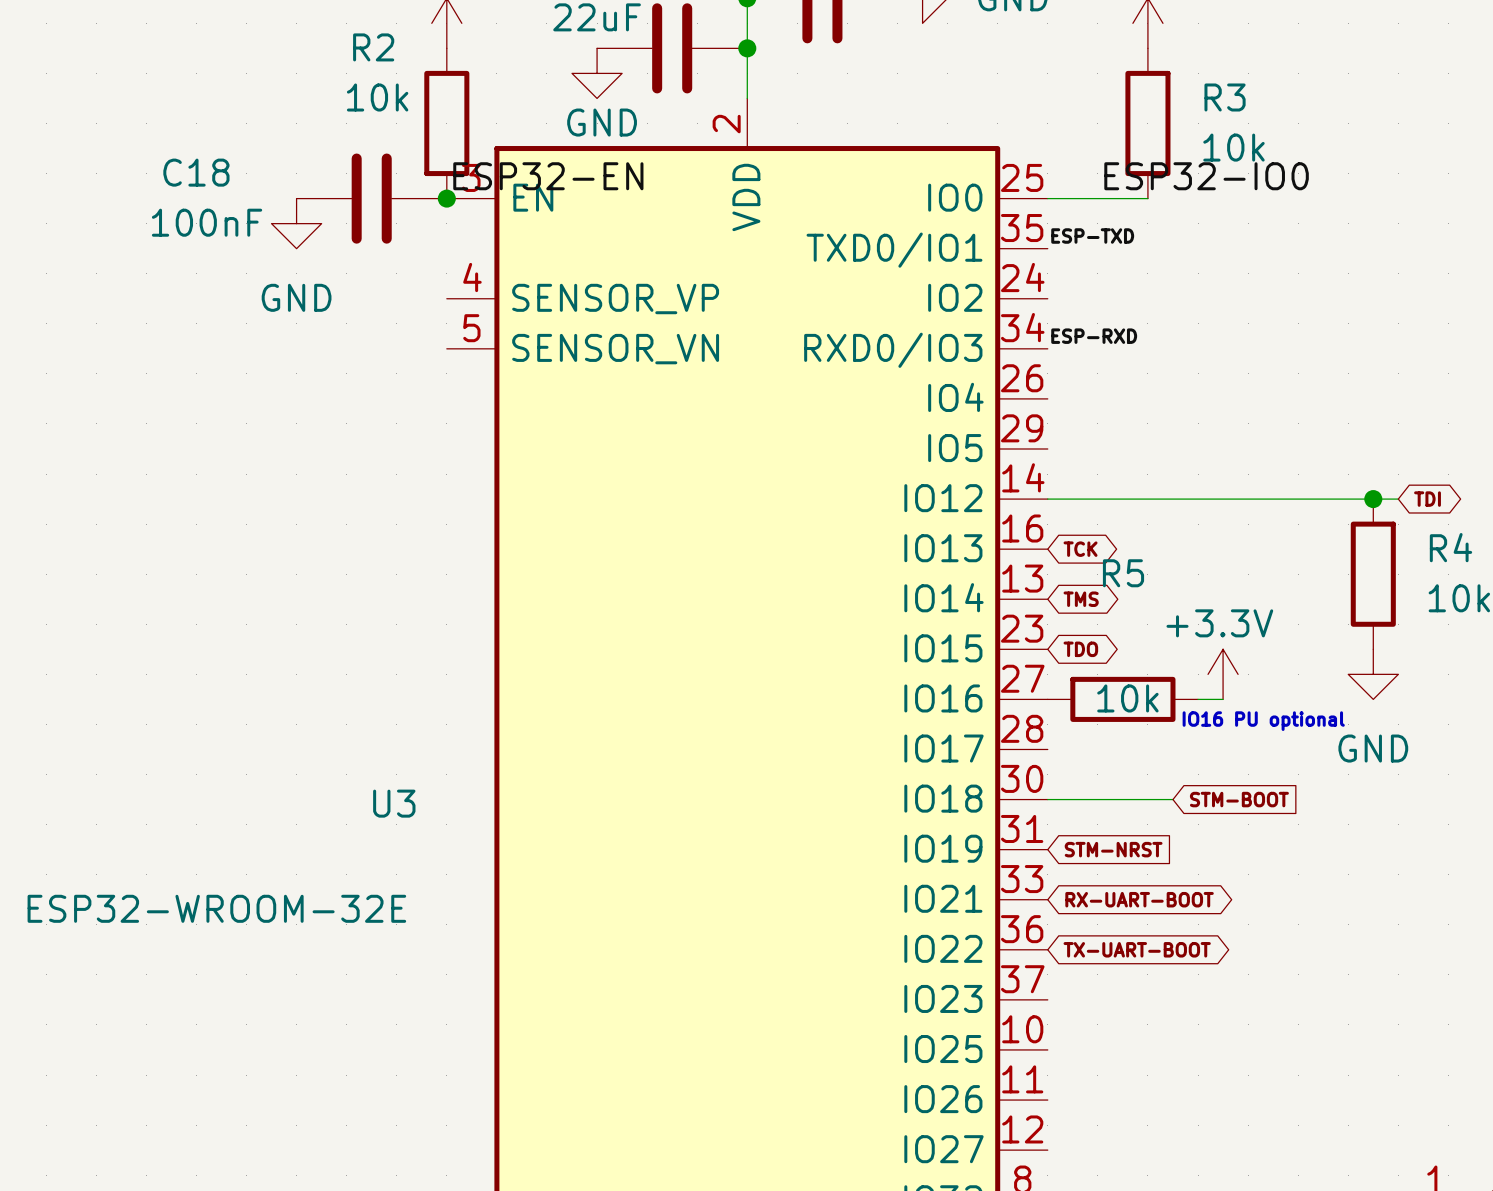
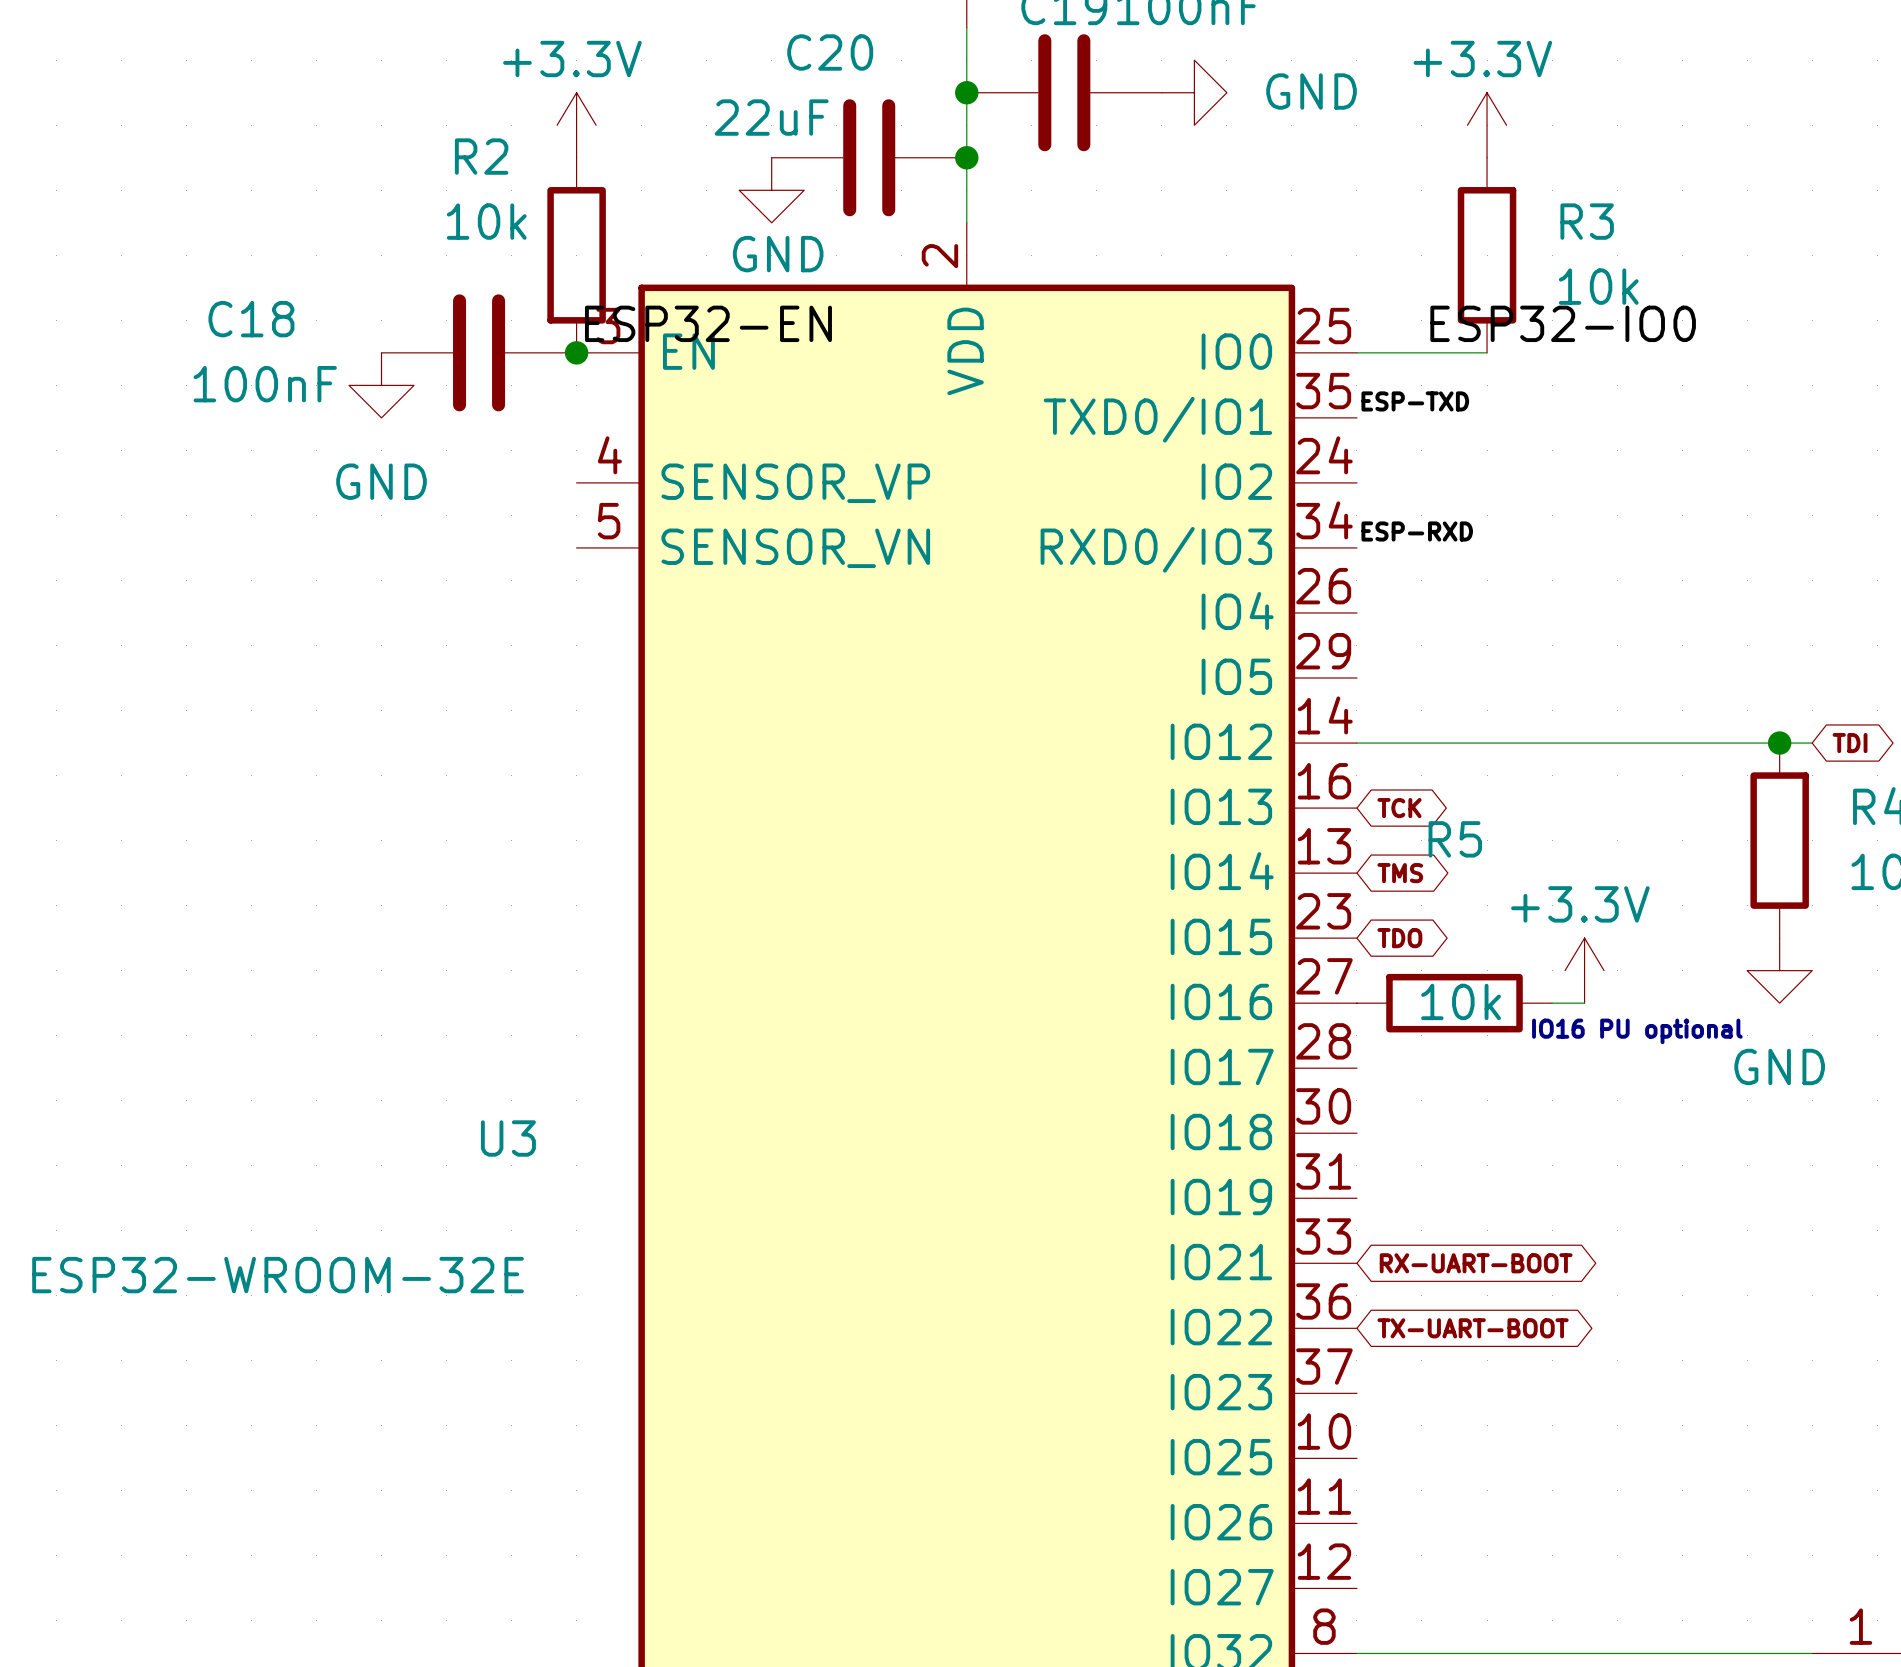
wire: (1047, 799) (1172, 799) -> none
global label: STM-BOOT (1239, 799) -> none
global label: STM-NRST (1113, 849) -> none

